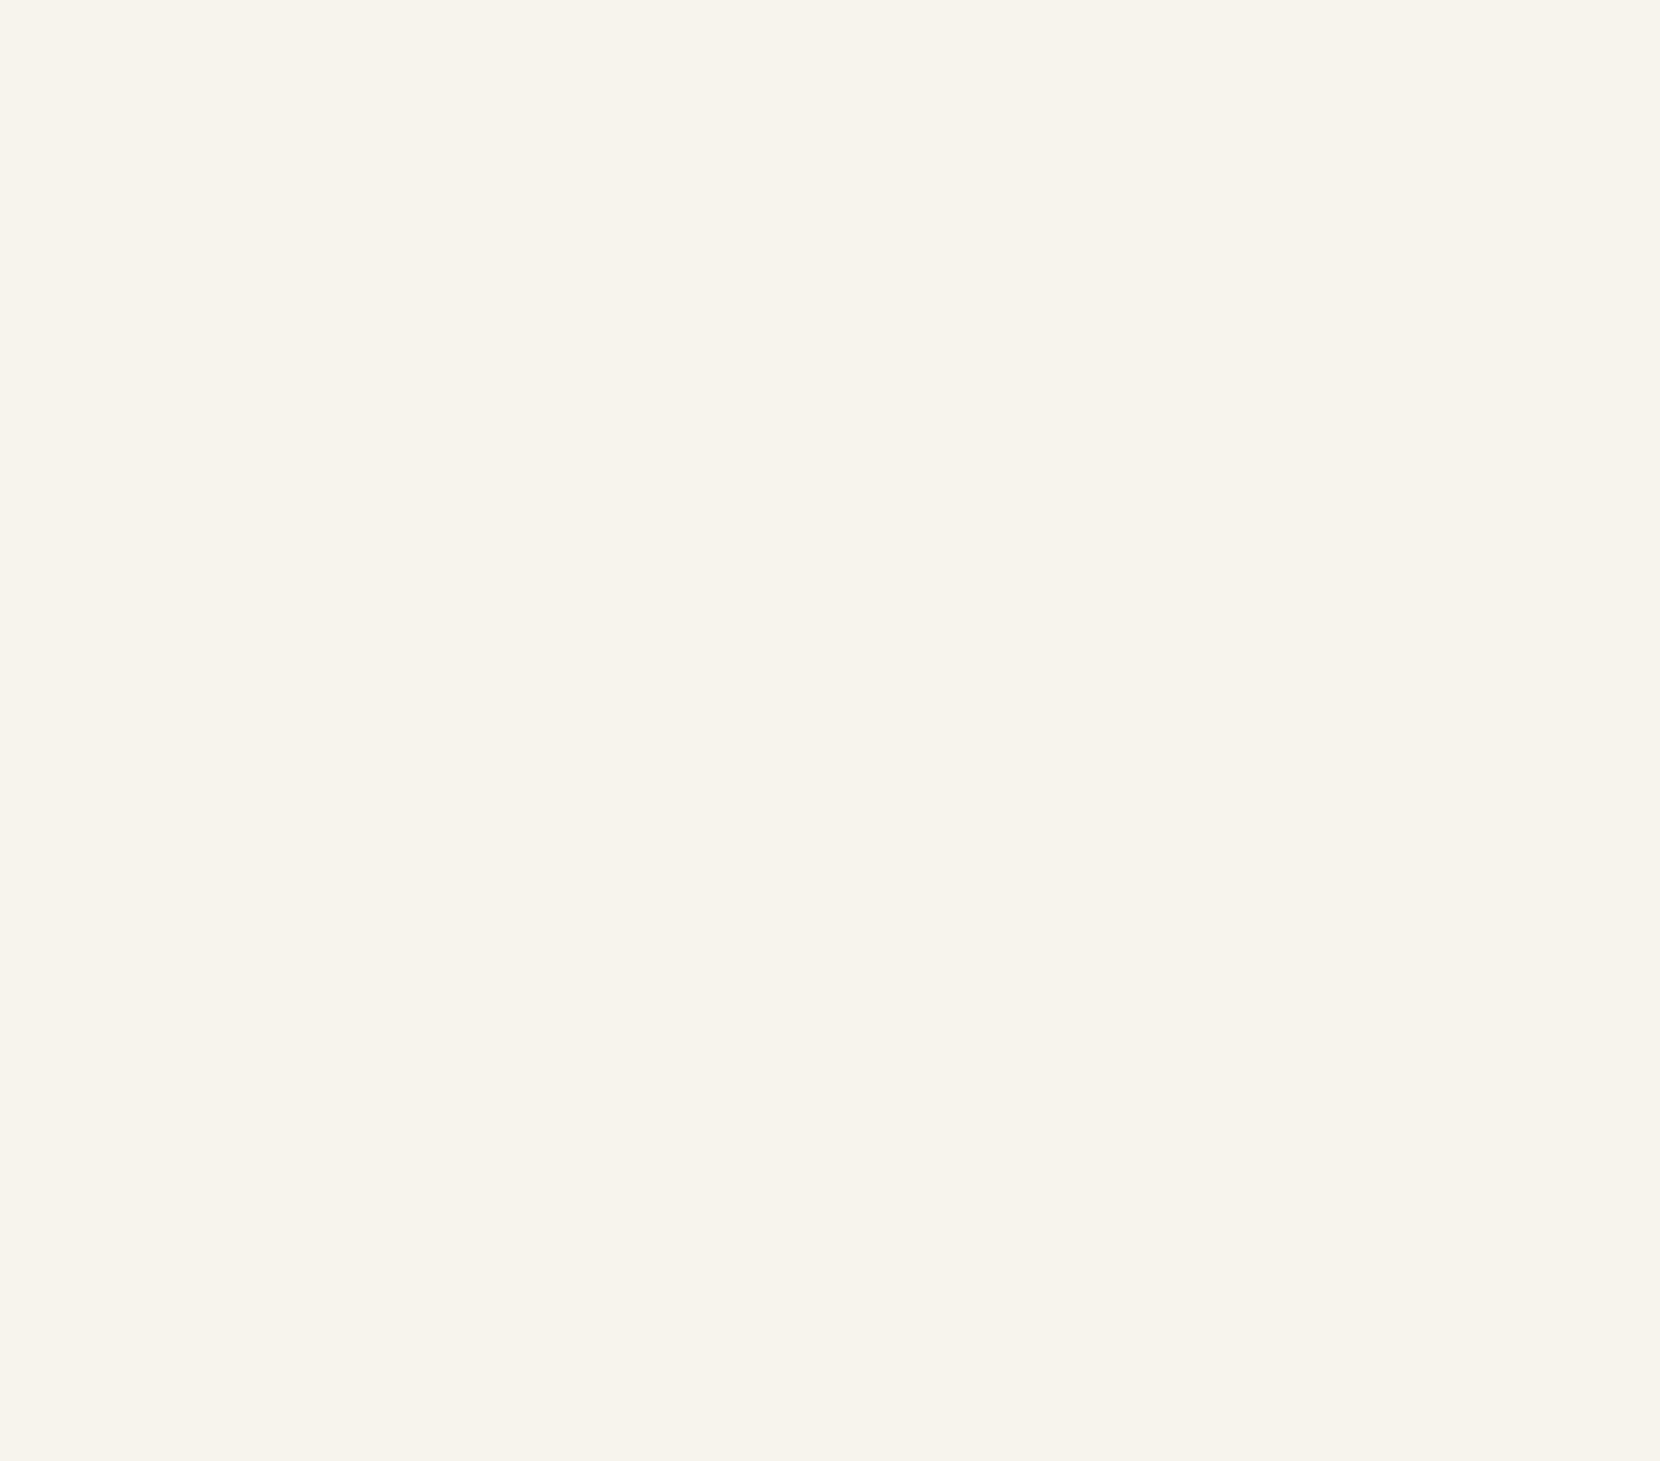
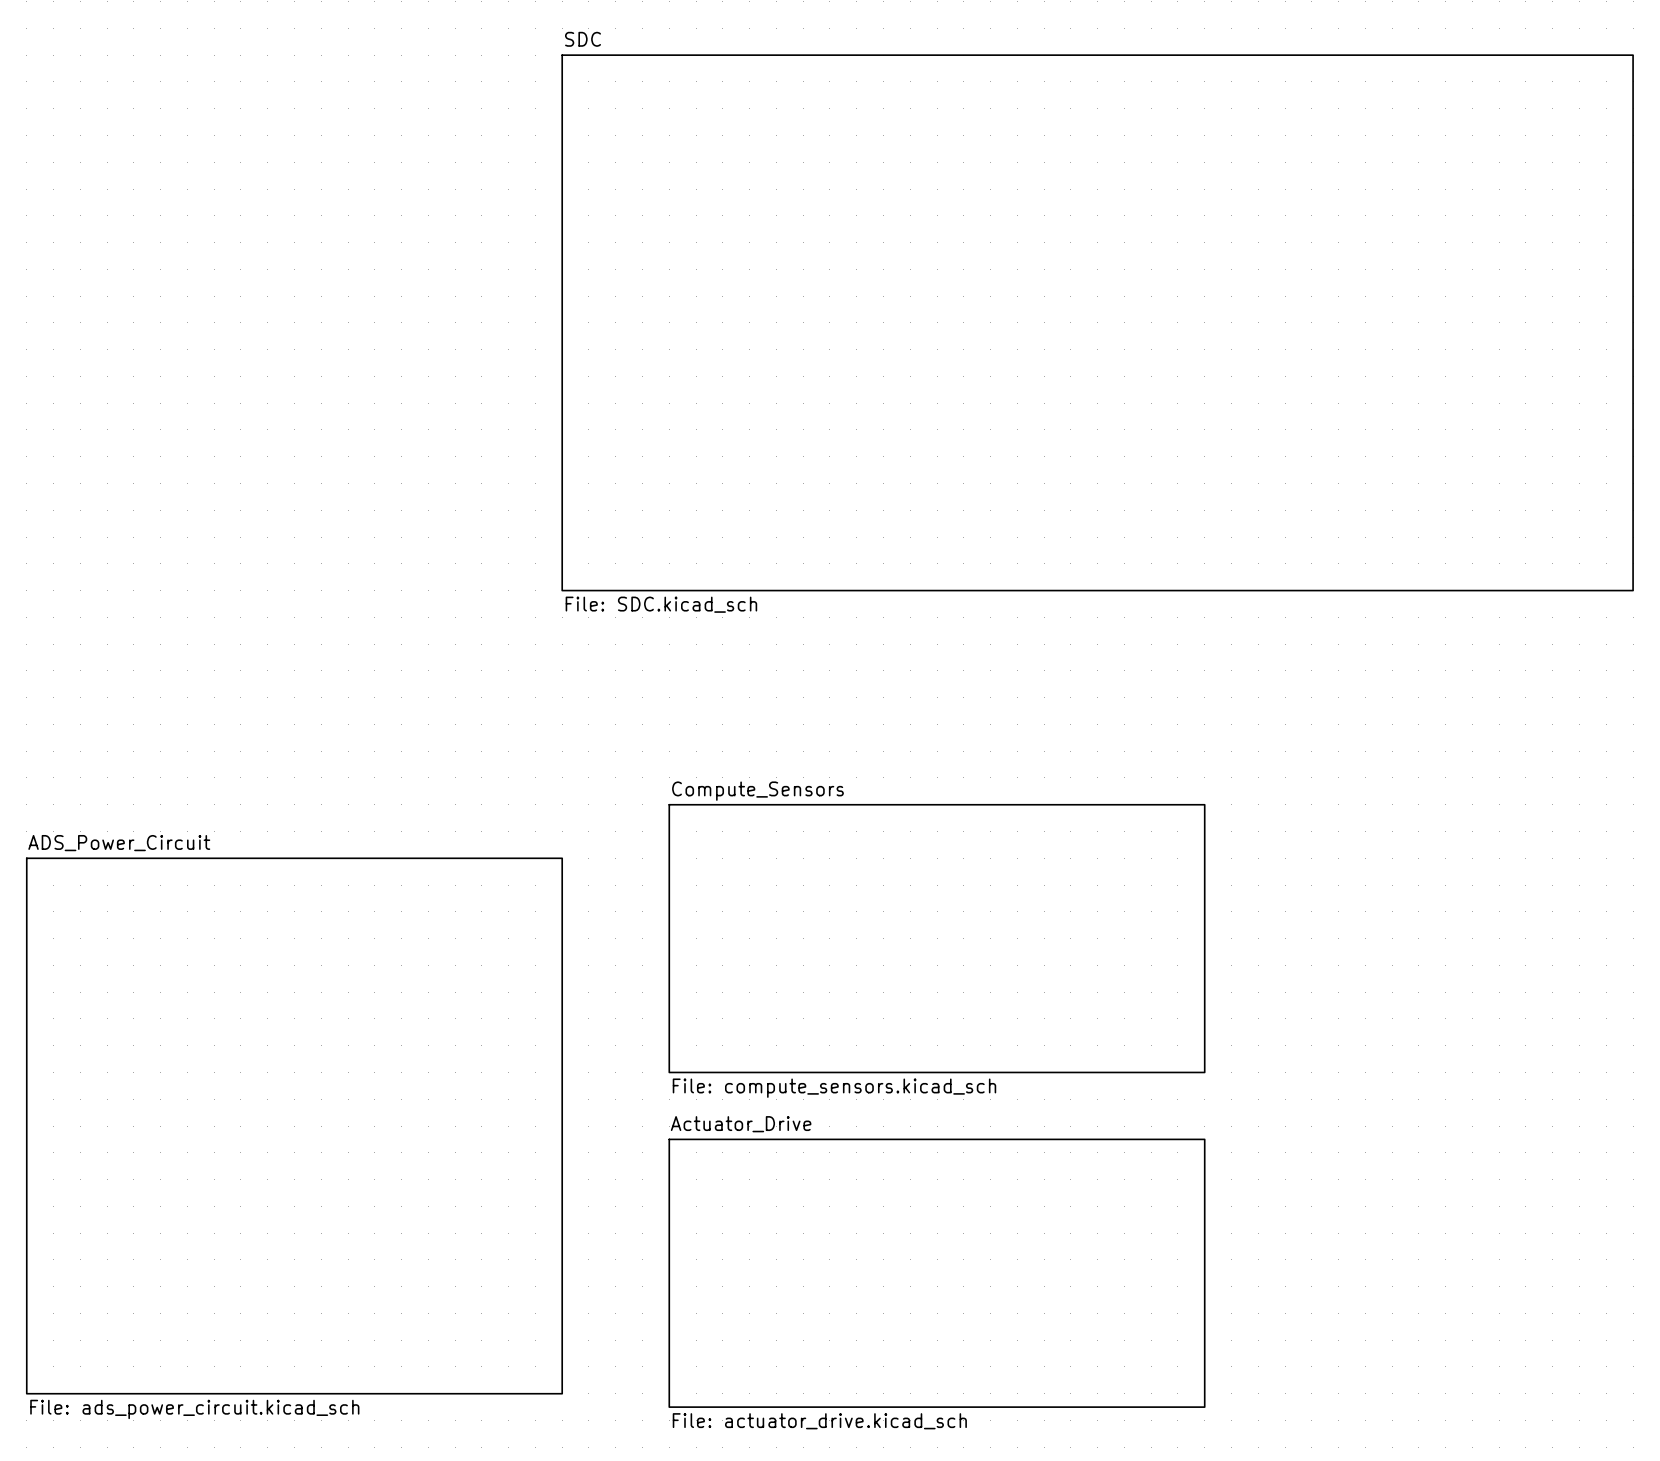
sheet SDC: none -> File: SDC.kicad_sch (1097, 322)
sheet Compute_Sensors: none -> File: compute_sensors.kicad_sch (937, 938)
sheet ADS_Power_Circuit: none -> File: ads_power_circuit.kicad_sch (294, 1126)
sheet Actuator_Drive: none -> File: actuator_drive.kicad_sch (937, 1273)

